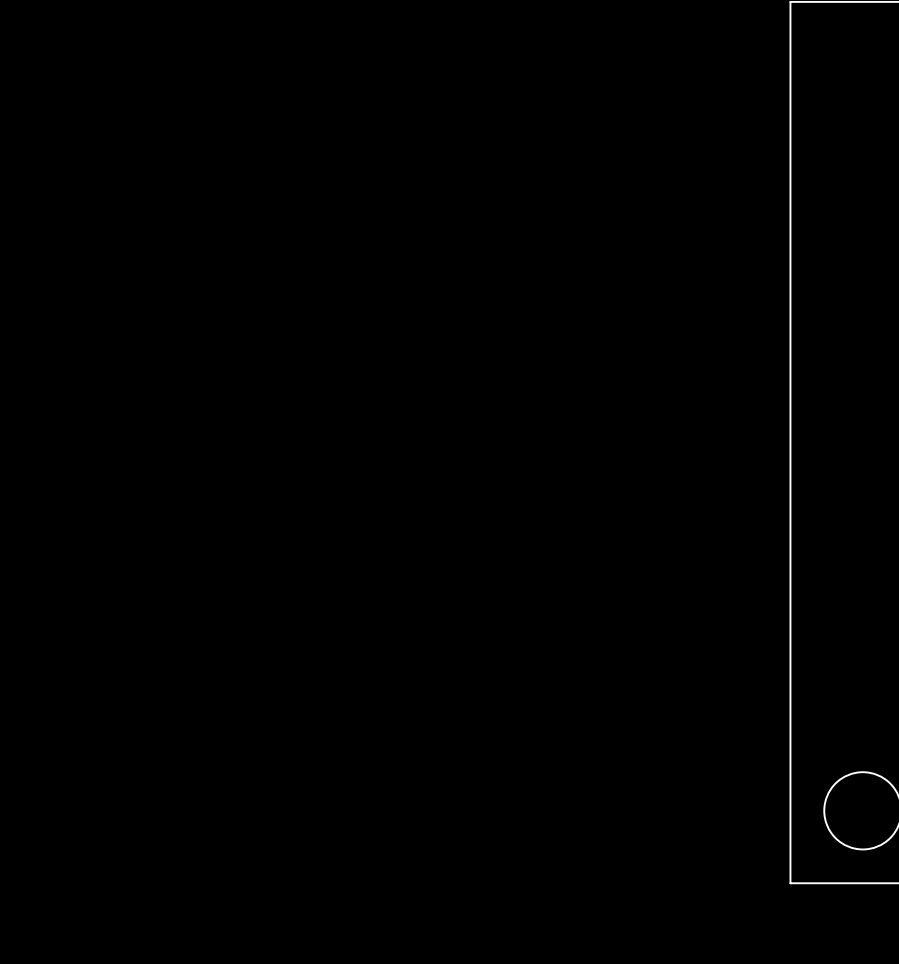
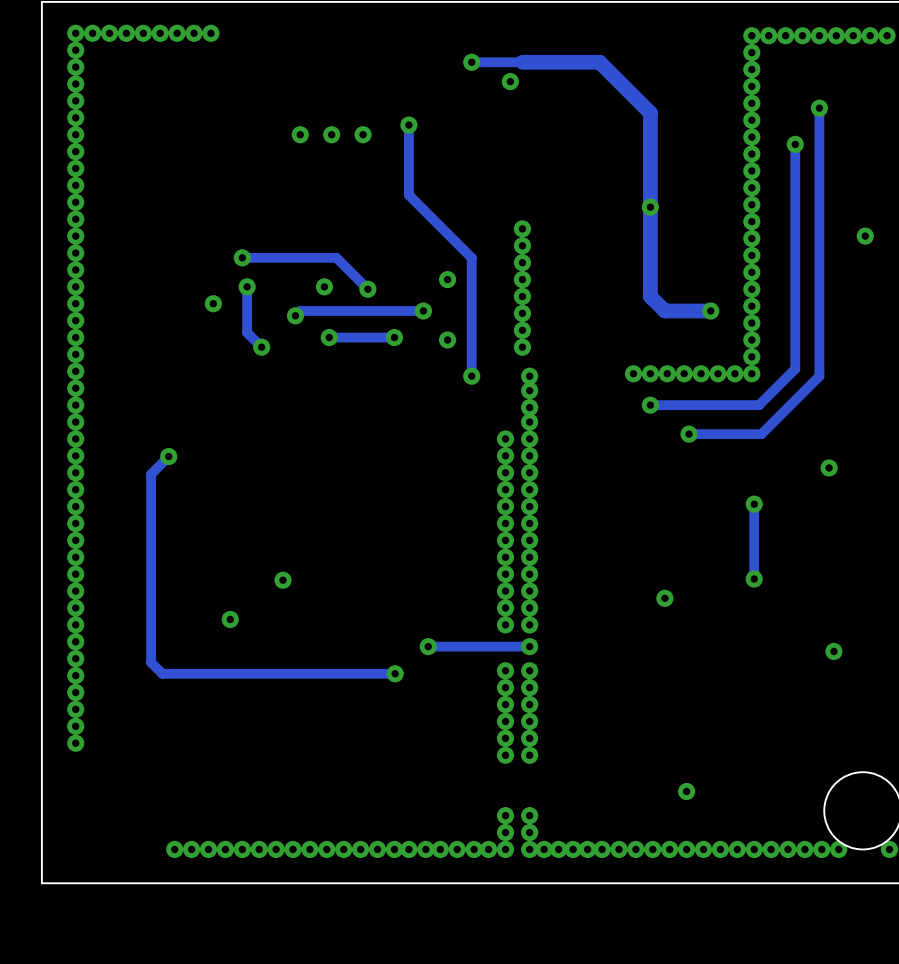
board edge: (790, 1) (790, 883) -> (790, 1) (41, 1) (41, 883) (790, 883)
via: none -> (75, 33)
via: none -> (92, 33)
via: none -> (109, 33)
via: none -> (126, 33)
via: none -> (143, 33)
via: none -> (160, 33)
via: none -> (177, 33)
via: none -> (194, 33)
via: none -> (210, 33)
via: none -> (751, 35)
via: none -> (768, 35)
via: none -> (785, 35)
via: none -> (802, 35)
via: none -> (819, 35)
via: none -> (836, 35)
via: none -> (853, 35)
via: none -> (870, 35)
via: none -> (887, 35)
via: none -> (75, 50)
via: none -> (751, 52)
track: none -> (471, 62) (599, 62) (650, 112) (650, 296) (664, 310) (710, 310)
via: none -> (471, 62)
via: none -> (75, 67)
via: none -> (751, 69)
via: none -> (510, 81)
via: none -> (75, 84)
via: none -> (751, 86)
via: none -> (75, 100)
via: none -> (751, 103)
track: none -> (819, 108) (819, 376) (761, 434) (689, 434)
via: none -> (819, 108)
via: none -> (75, 117)
via: none -> (751, 120)
track: none -> (408, 125) (408, 195) (471, 257) (471, 376)
via: none -> (408, 125)
via: none -> (75, 134)
via: none -> (300, 134)
via: none -> (331, 134)
via: none -> (363, 134)
via: none -> (751, 137)
track: none -> (795, 144) (795, 368) (759, 405) (650, 405)
via: none -> (795, 144)
via: none -> (75, 151)
via: none -> (751, 154)
via: none -> (75, 168)
via: none -> (751, 170)
via: none -> (75, 185)
via: none -> (751, 187)
via: none -> (75, 202)
via: none -> (751, 204)
via: none -> (650, 207)
via: none -> (75, 219)
via: none -> (751, 221)
via: none -> (522, 228)
via: none -> (75, 236)
via: none -> (865, 236)
via: none -> (751, 238)
via: none -> (522, 245)
via: none -> (75, 253)
via: none -> (751, 255)
track: none -> (242, 257) (336, 257) (367, 289)
via: none -> (242, 257)
via: none -> (522, 262)
via: none -> (75, 269)
via: none -> (751, 272)
via: none -> (447, 279)
via: none -> (522, 279)
via: none -> (75, 286)
track: none -> (247, 286) (247, 332) (261, 347)
via: none -> (247, 286)
via: none -> (324, 286)
via: none -> (367, 289)
via: none -> (751, 289)
via: none -> (522, 296)
via: none -> (75, 303)
via: none -> (213, 303)
via: none -> (751, 306)
track: none -> (423, 310) (300, 310) (295, 315)
via: none -> (423, 310)
via: none -> (710, 310)
via: none -> (522, 313)
via: none -> (295, 315)
via: none -> (75, 320)
via: none -> (751, 323)
via: none -> (522, 330)
via: none -> (75, 337)
via: none -> (329, 337)
track: none -> (394, 337) (329, 337)
via: none -> (394, 337)
via: none -> (447, 339)
via: none -> (751, 339)
via: none -> (261, 347)
via: none -> (522, 347)
via: none -> (75, 354)
via: none -> (751, 356)
via: none -> (75, 371)
via: none -> (633, 373)
via: none -> (650, 373)
via: none -> (667, 373)
via: none -> (684, 373)
via: none -> (701, 373)
via: none -> (718, 373)
via: none -> (734, 373)
via: none -> (751, 373)
via: none -> (471, 376)
via: none -> (529, 376)
via: none -> (75, 388)
via: none -> (529, 390)
via: none -> (75, 405)
via: none -> (650, 405)
via: none -> (529, 407)
via: none -> (75, 422)
via: none -> (529, 422)
via: none -> (689, 434)
via: none -> (75, 438)
via: none -> (505, 438)
via: none -> (529, 438)
via: none -> (75, 455)
via: none -> (505, 455)
via: none -> (529, 455)
track: none -> (168, 456) (151, 474) (151, 662) (162, 673) (395, 673)
via: none -> (168, 456)
via: none -> (829, 467)
via: none -> (75, 472)
via: none -> (505, 472)
via: none -> (529, 472)
via: none -> (75, 489)
via: none -> (505, 489)
via: none -> (529, 489)
track: none -> (754, 504) (754, 579)
via: none -> (754, 504)
via: none -> (75, 506)
via: none -> (505, 506)
via: none -> (529, 506)
via: none -> (75, 523)
via: none -> (505, 523)
via: none -> (529, 523)
via: none -> (75, 540)
via: none -> (505, 540)
via: none -> (529, 540)
via: none -> (75, 557)
via: none -> (505, 557)
via: none -> (529, 557)
via: none -> (75, 574)
via: none -> (505, 574)
via: none -> (529, 574)
via: none -> (754, 579)
via: none -> (283, 580)
via: none -> (75, 591)
via: none -> (505, 591)
via: none -> (529, 591)
via: none -> (664, 598)
via: none -> (75, 607)
via: none -> (505, 607)
via: none -> (529, 607)
via: none -> (230, 619)
via: none -> (75, 624)
via: none -> (505, 624)
via: none -> (529, 624)
via: none -> (75, 641)
via: none -> (428, 646)
track: none -> (529, 646) (428, 646)
via: none -> (529, 646)
via: none -> (833, 651)
via: none -> (75, 658)
via: none -> (505, 670)
via: none -> (529, 670)
via: none -> (395, 673)
via: none -> (75, 675)
via: none -> (505, 687)
via: none -> (529, 687)
via: none -> (75, 692)
via: none -> (505, 704)
via: none -> (529, 704)
via: none -> (75, 709)
via: none -> (505, 721)
via: none -> (529, 721)
via: none -> (75, 726)
via: none -> (505, 738)
via: none -> (529, 738)
via: none -> (75, 743)
via: none -> (505, 755)
via: none -> (529, 755)
via: none -> (686, 791)
via: none -> (505, 815)
via: none -> (529, 815)
via: none -> (505, 832)
via: none -> (529, 832)
via: none -> (174, 849)
via: none -> (191, 849)
via: none -> (208, 849)
via: none -> (225, 849)
via: none -> (242, 849)
via: none -> (259, 849)
via: none -> (276, 849)
via: none -> (293, 849)
via: none -> (309, 849)
via: none -> (326, 849)
via: none -> (343, 849)
via: none -> (360, 849)
via: none -> (377, 849)
via: none -> (394, 849)
via: none -> (408, 849)
via: none -> (425, 849)
via: none -> (440, 849)
via: none -> (457, 849)
via: none -> (474, 849)
via: none -> (488, 849)
via: none -> (505, 849)
via: none -> (529, 849)
via: none -> (544, 849)
via: none -> (558, 849)
via: none -> (573, 849)
via: none -> (587, 849)
via: none -> (602, 849)
via: none -> (619, 849)
via: none -> (635, 849)
via: none -> (652, 849)
via: none -> (669, 849)
via: none -> (686, 849)
via: none -> (703, 849)
via: none -> (720, 849)
via: none -> (737, 849)
via: none -> (754, 849)
via: none -> (771, 849)
via: none -> (788, 849)
via: none -> (804, 849)
via: none -> (821, 849)
via: none -> (838, 849)
via: none -> (889, 849)

